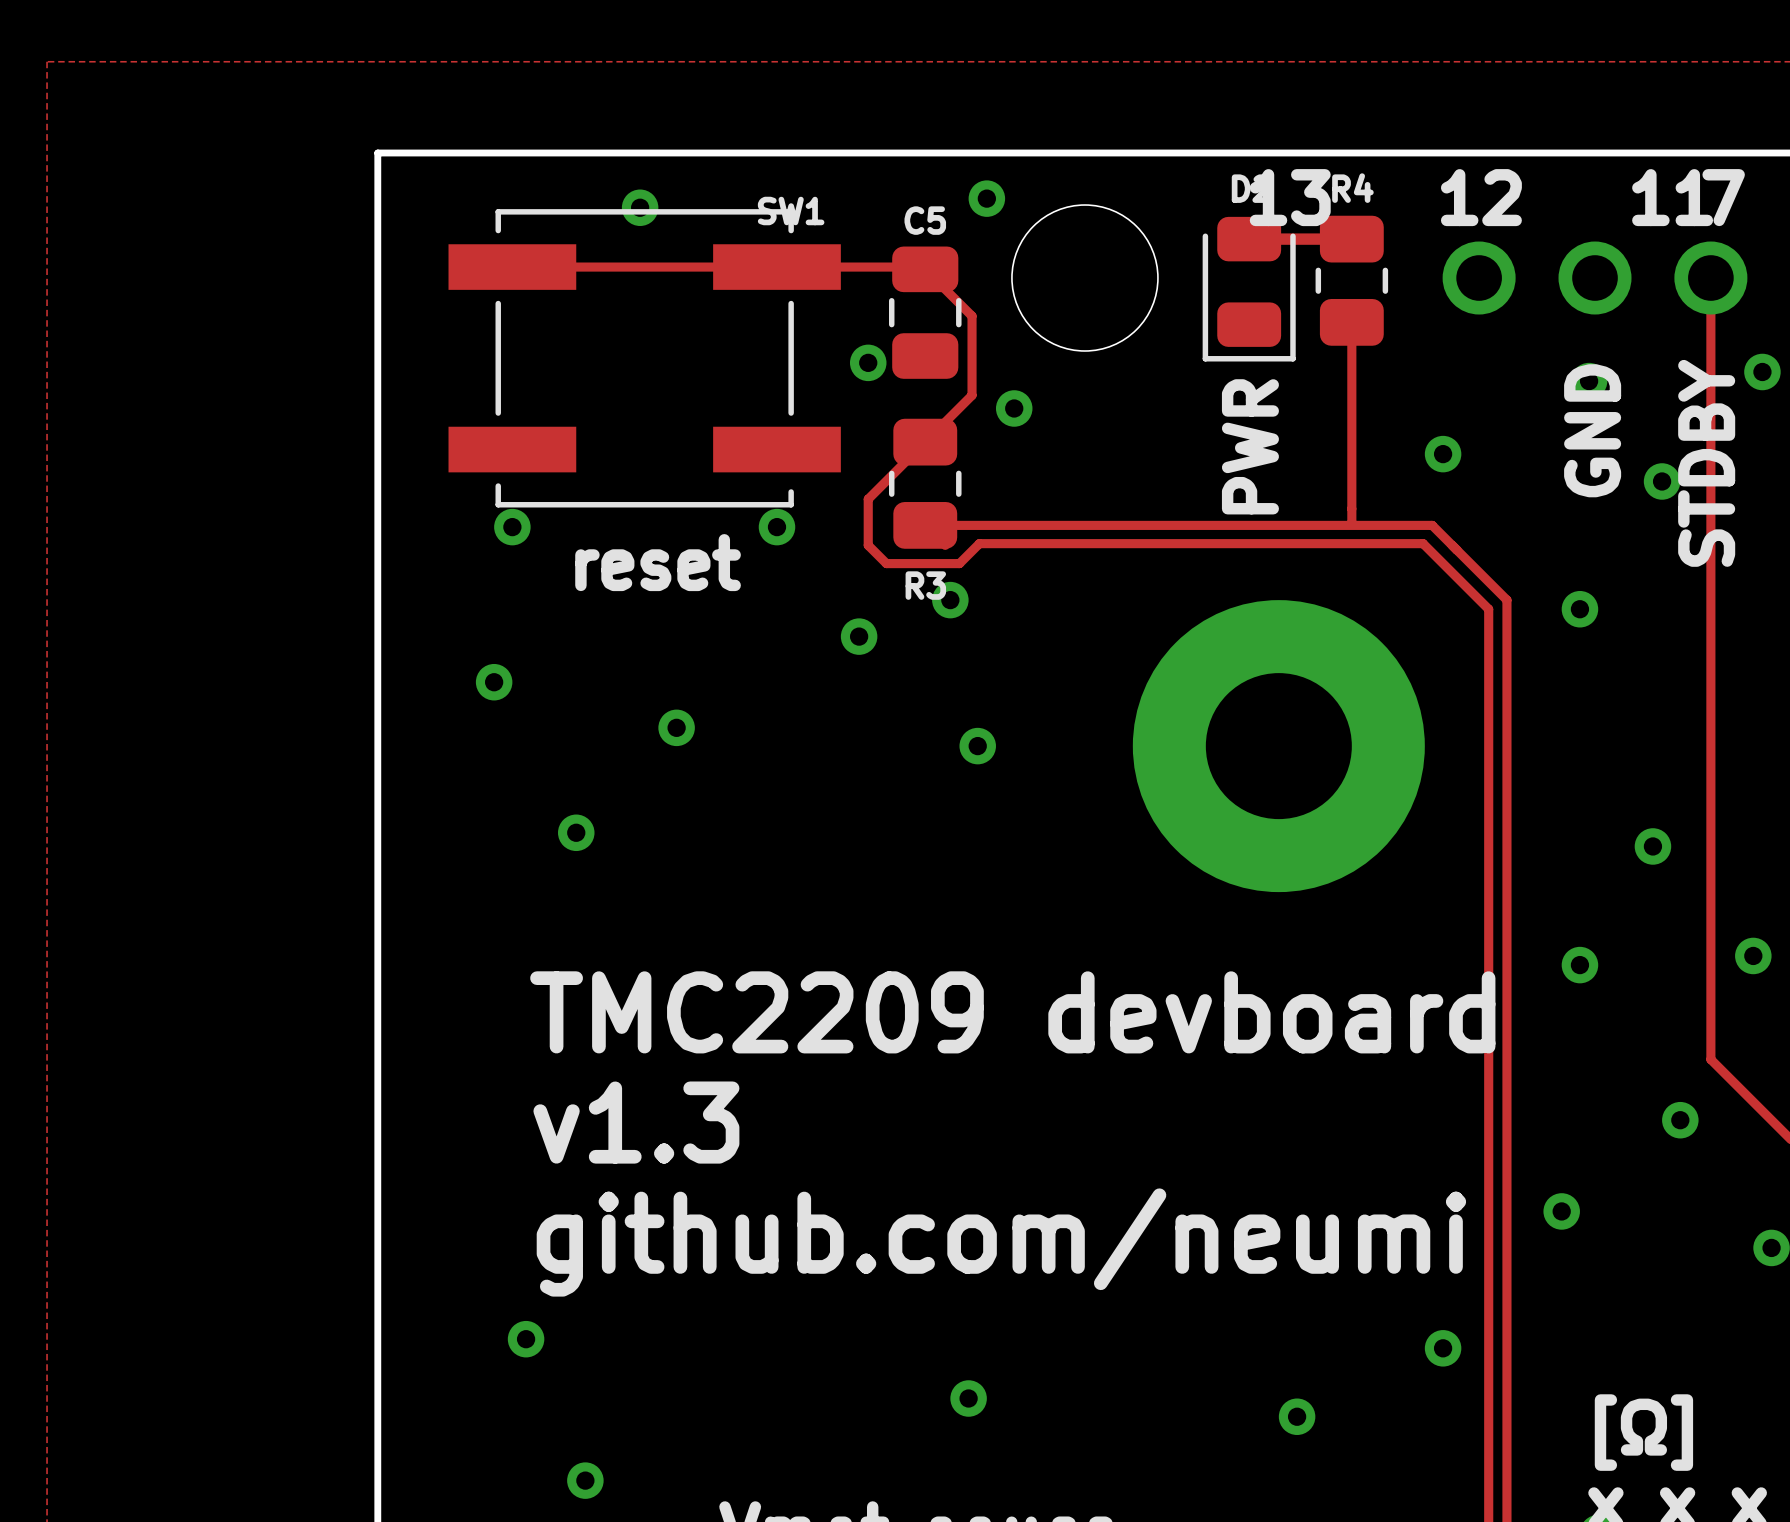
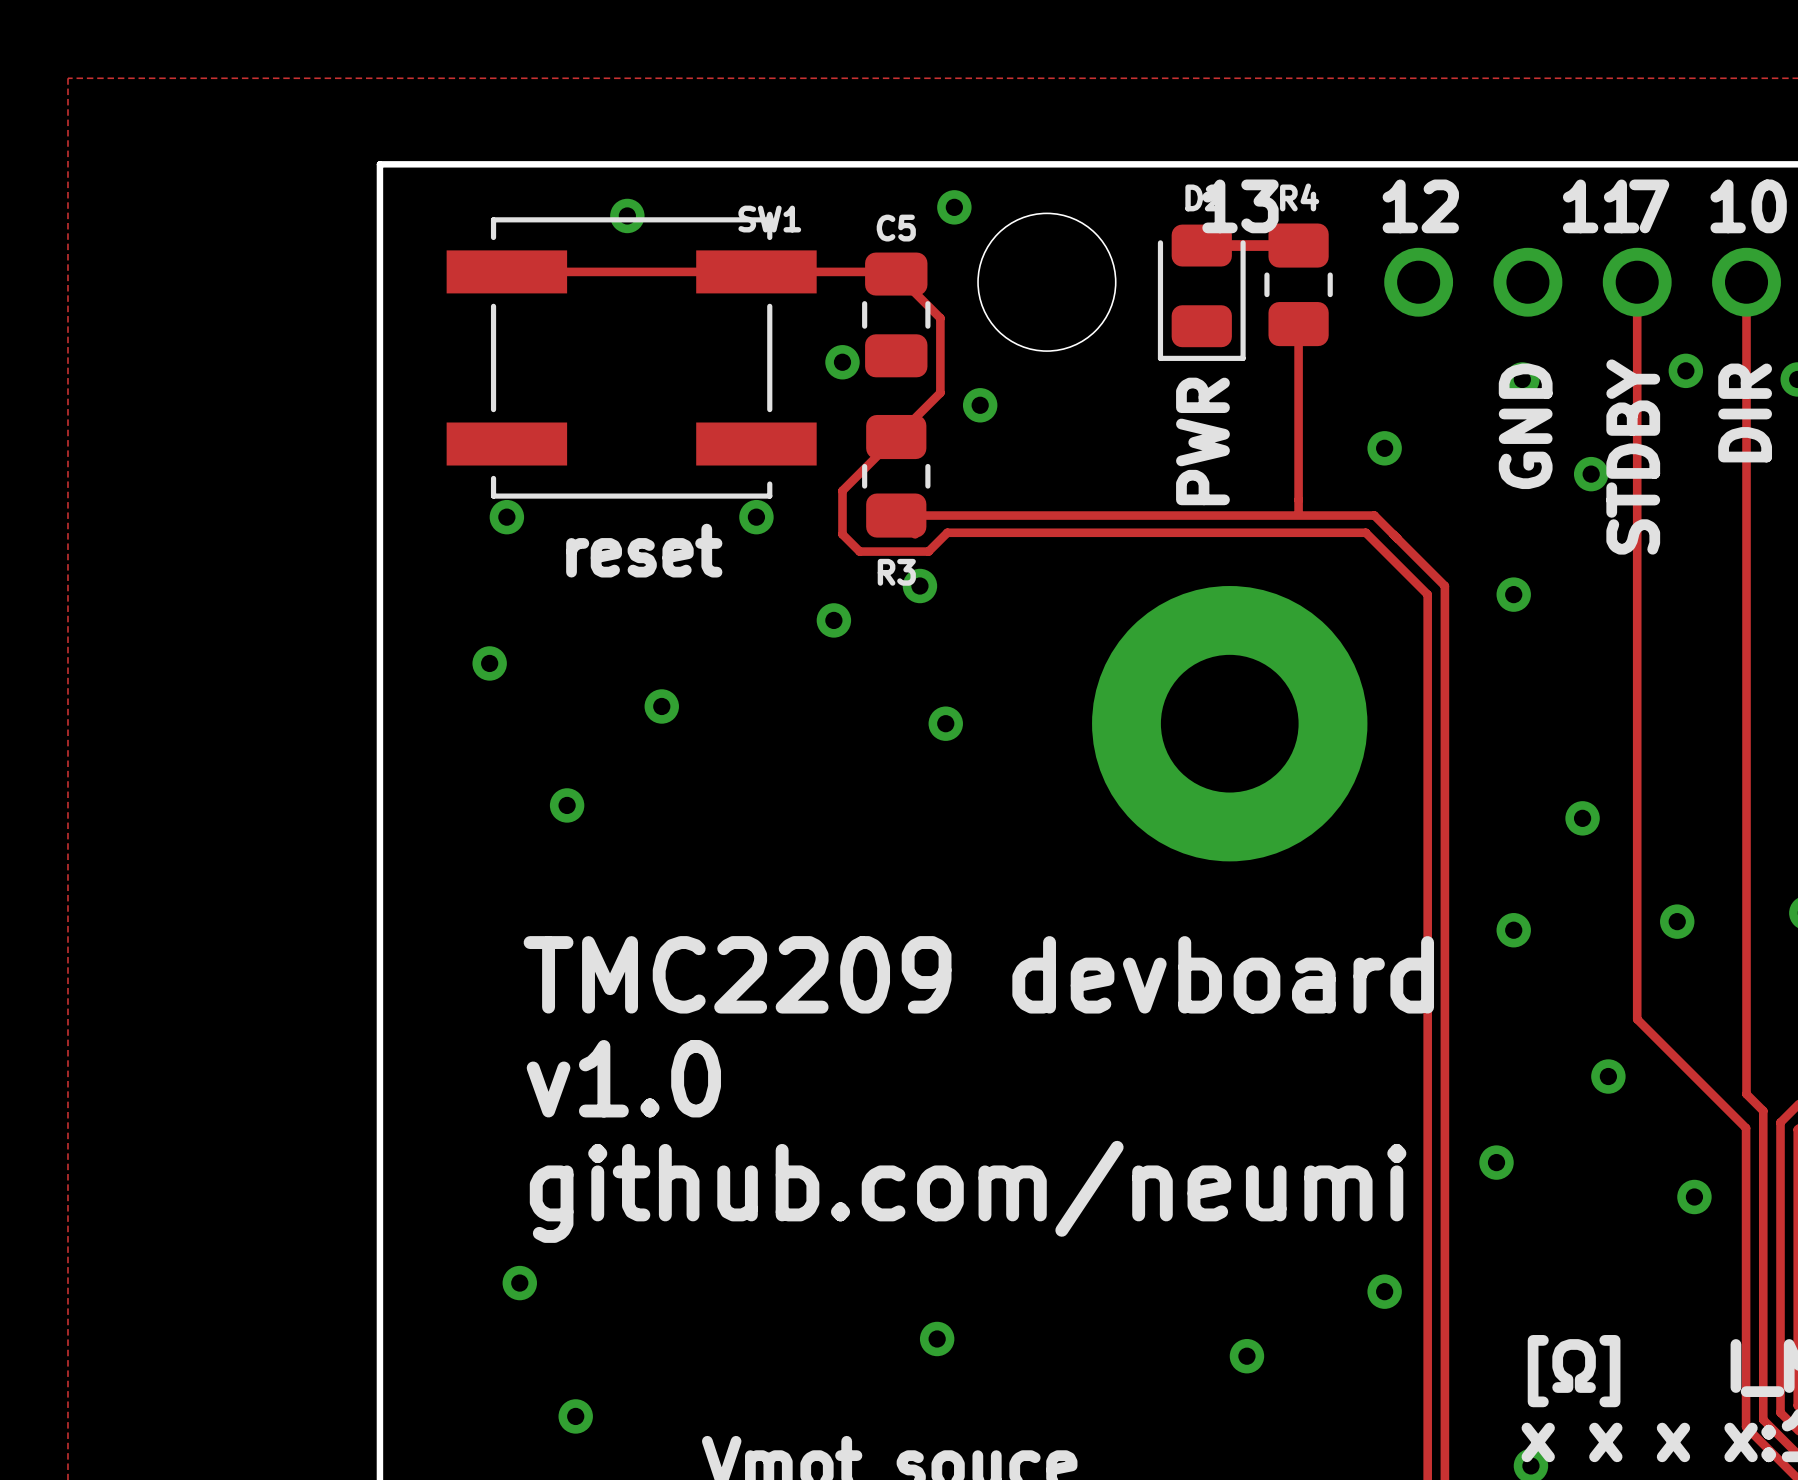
text: v1.3 (636, 1122) -> v1.0 (623, 1078)

